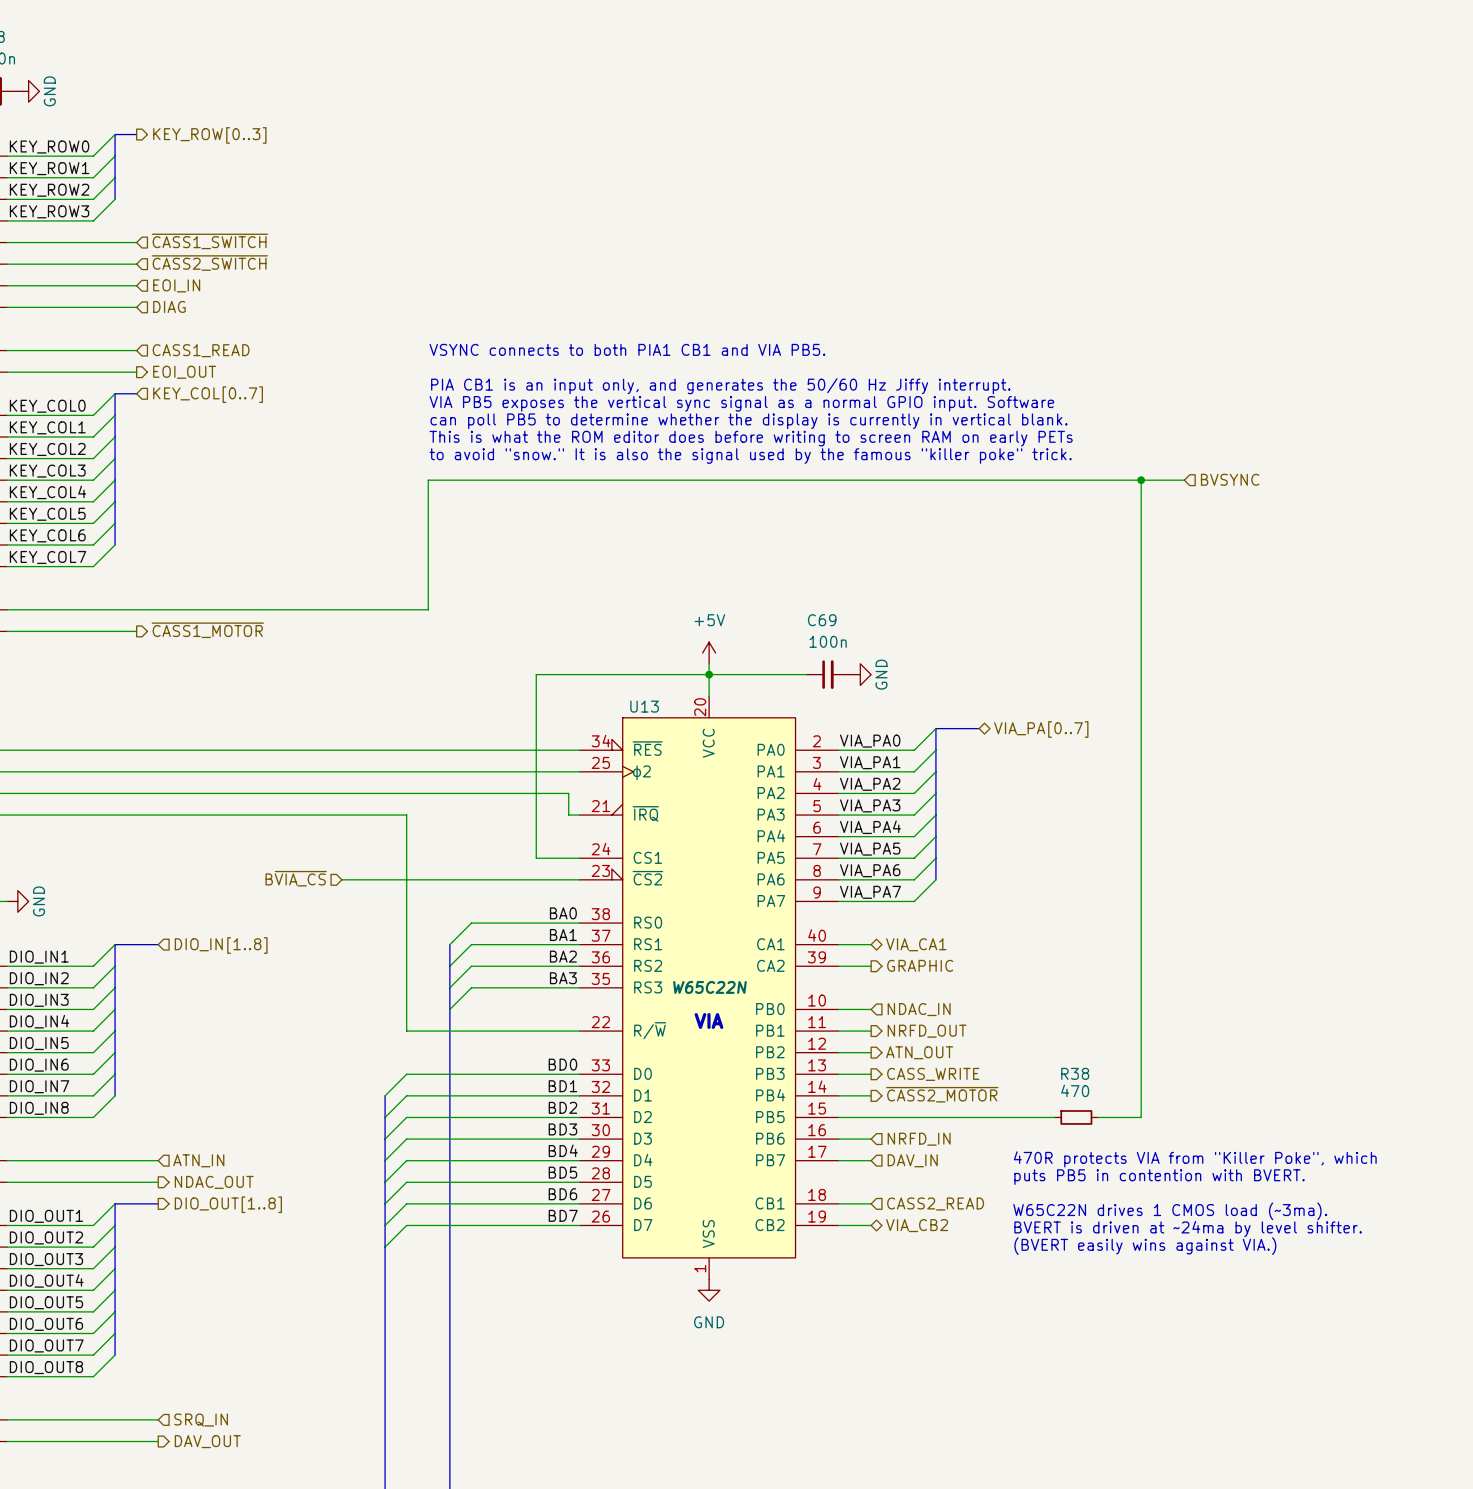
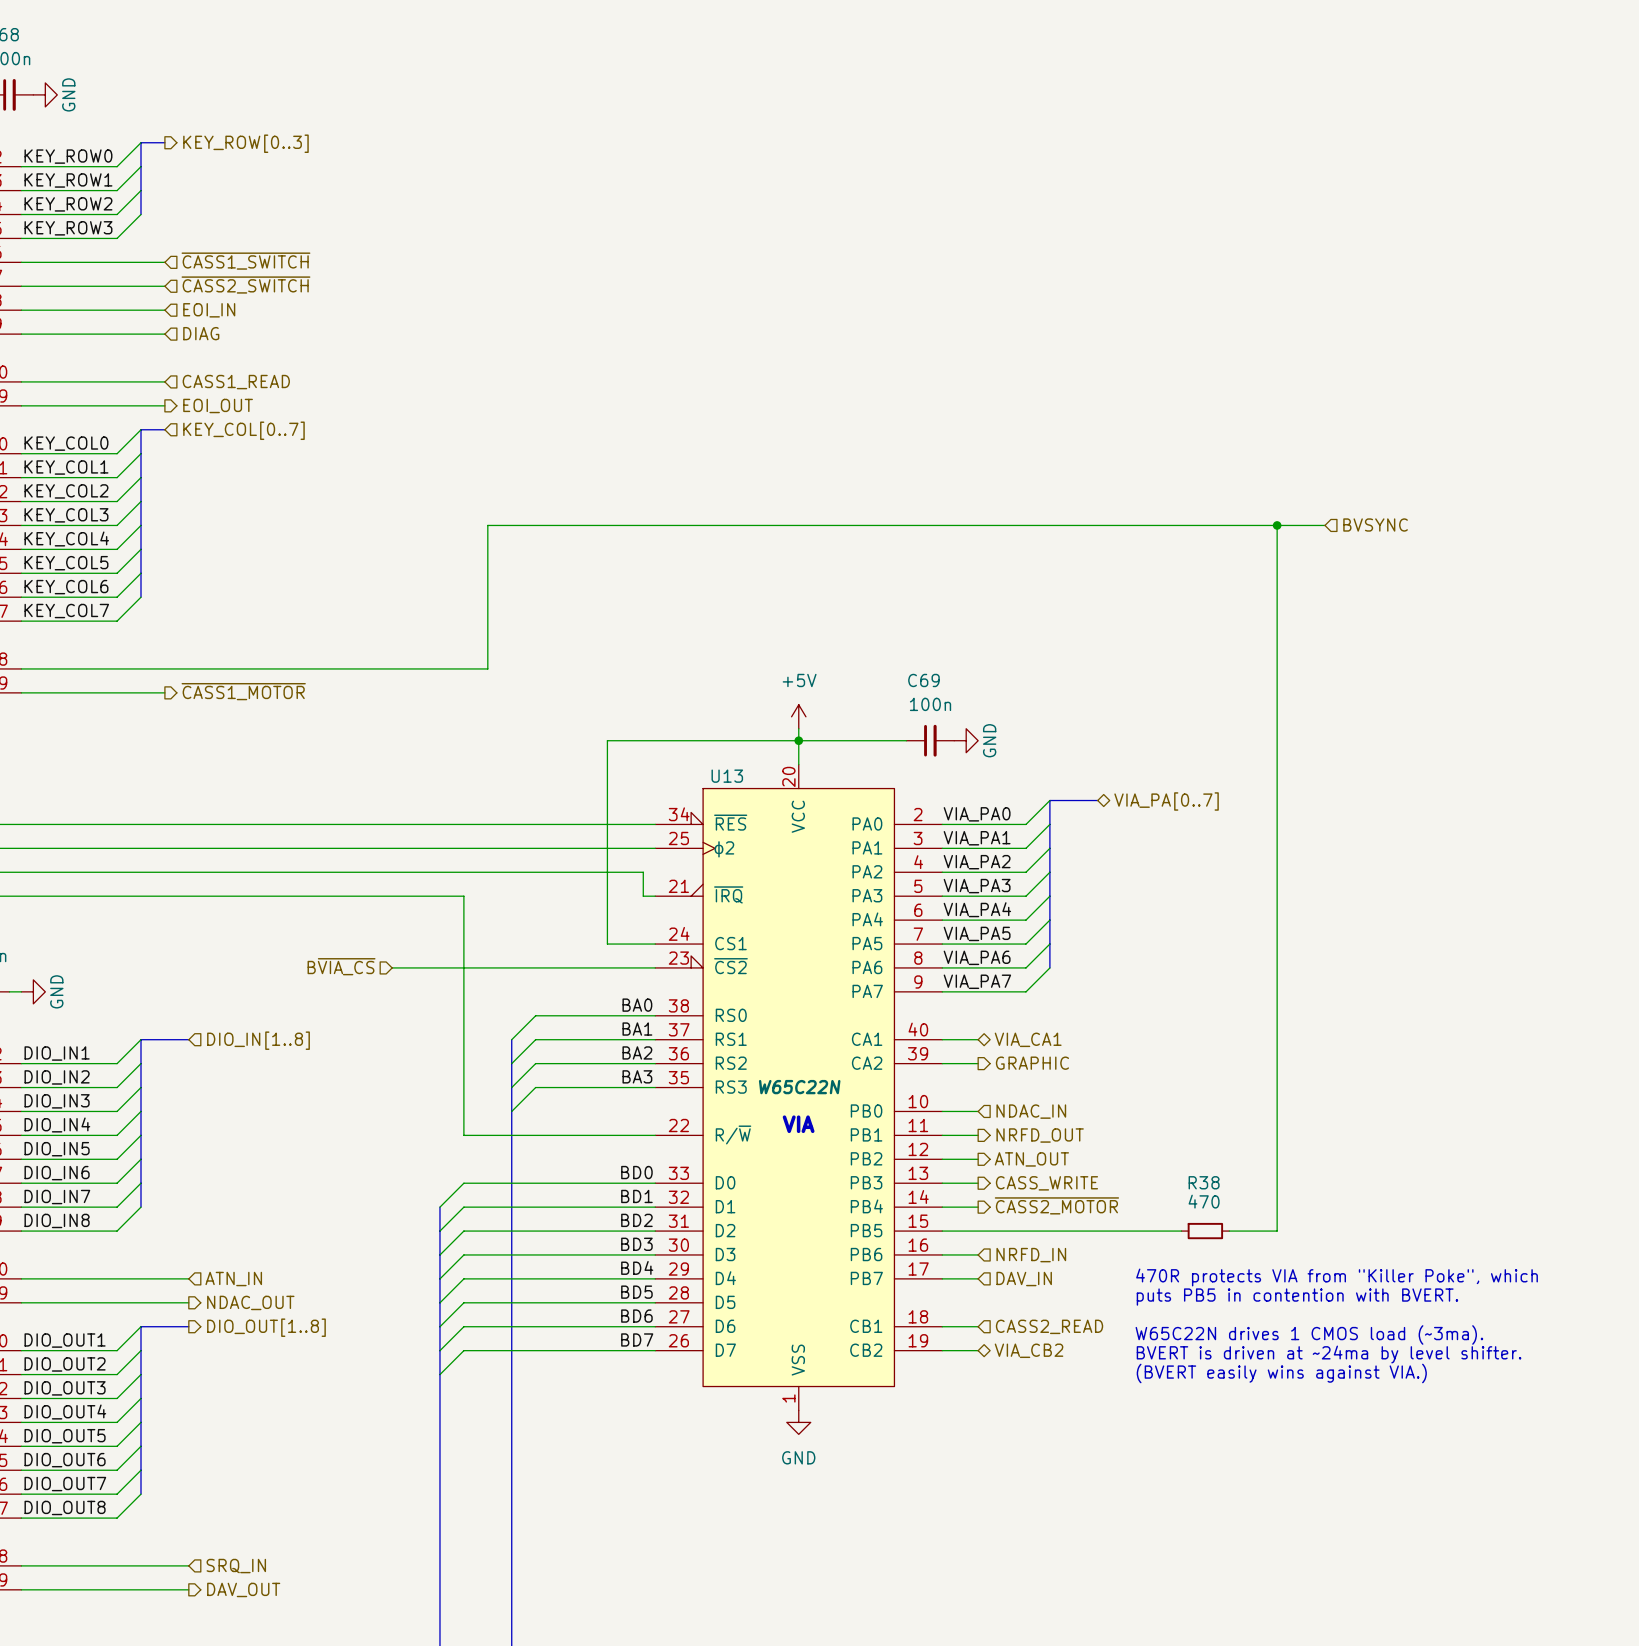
text: VSYNC connects to both PIA1 CB1 and VIA PB5. (627, 349) -> none
text: PIA CB1 is an input only, and generates the 50/60 Hz Jiffy interrupt. (720, 386) -> none
text: VIA PB5 exposes the vertical sync signal as a normal GPIO input. Software (741, 403) -> none
text: can poll PB5 to determine whether the display is currently in vertical blank. (749, 421) -> none
text: This is what the ROM editor does before writing to screen RAM on early PETs (751, 438) -> none
text: to avoid "snow." It is also the signal used by the famous "killer poke" trick. (750, 456) -> none

